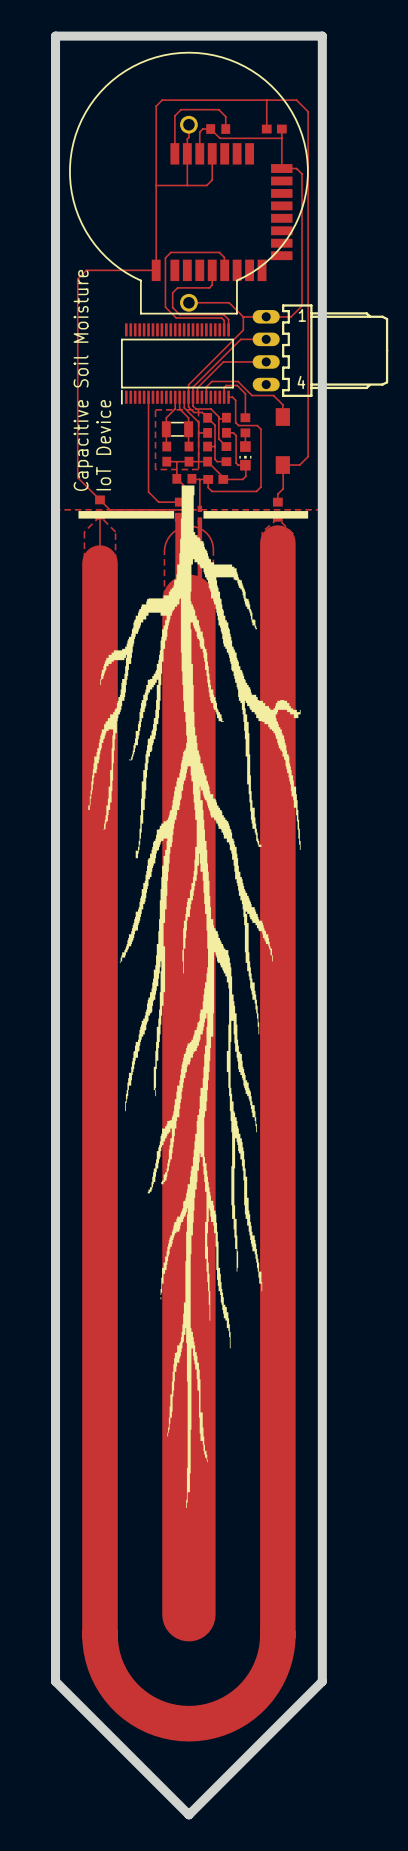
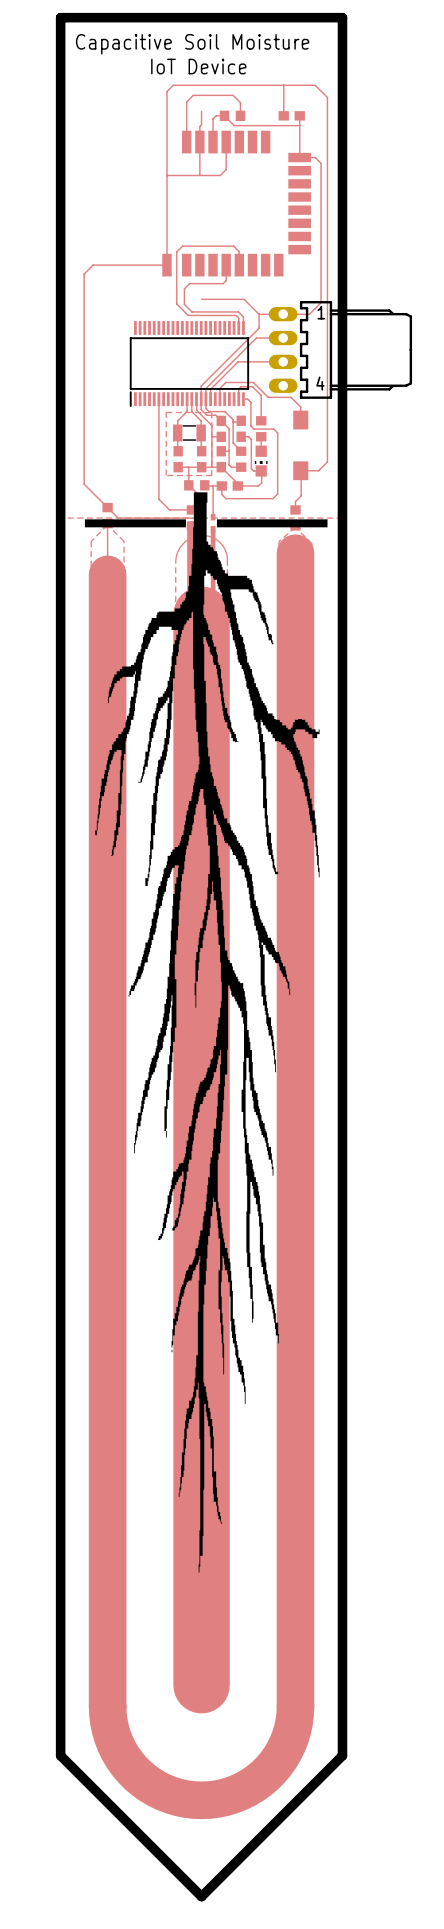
text: none -> Capacitive Soil Moisture (192, 44)
text: none -> IoT Device (198, 66)
part: (188, 183) -> none
text: Capacitive Soil Moisture (83, 380) -> none
text: IoT Device (103, 445) -> none

